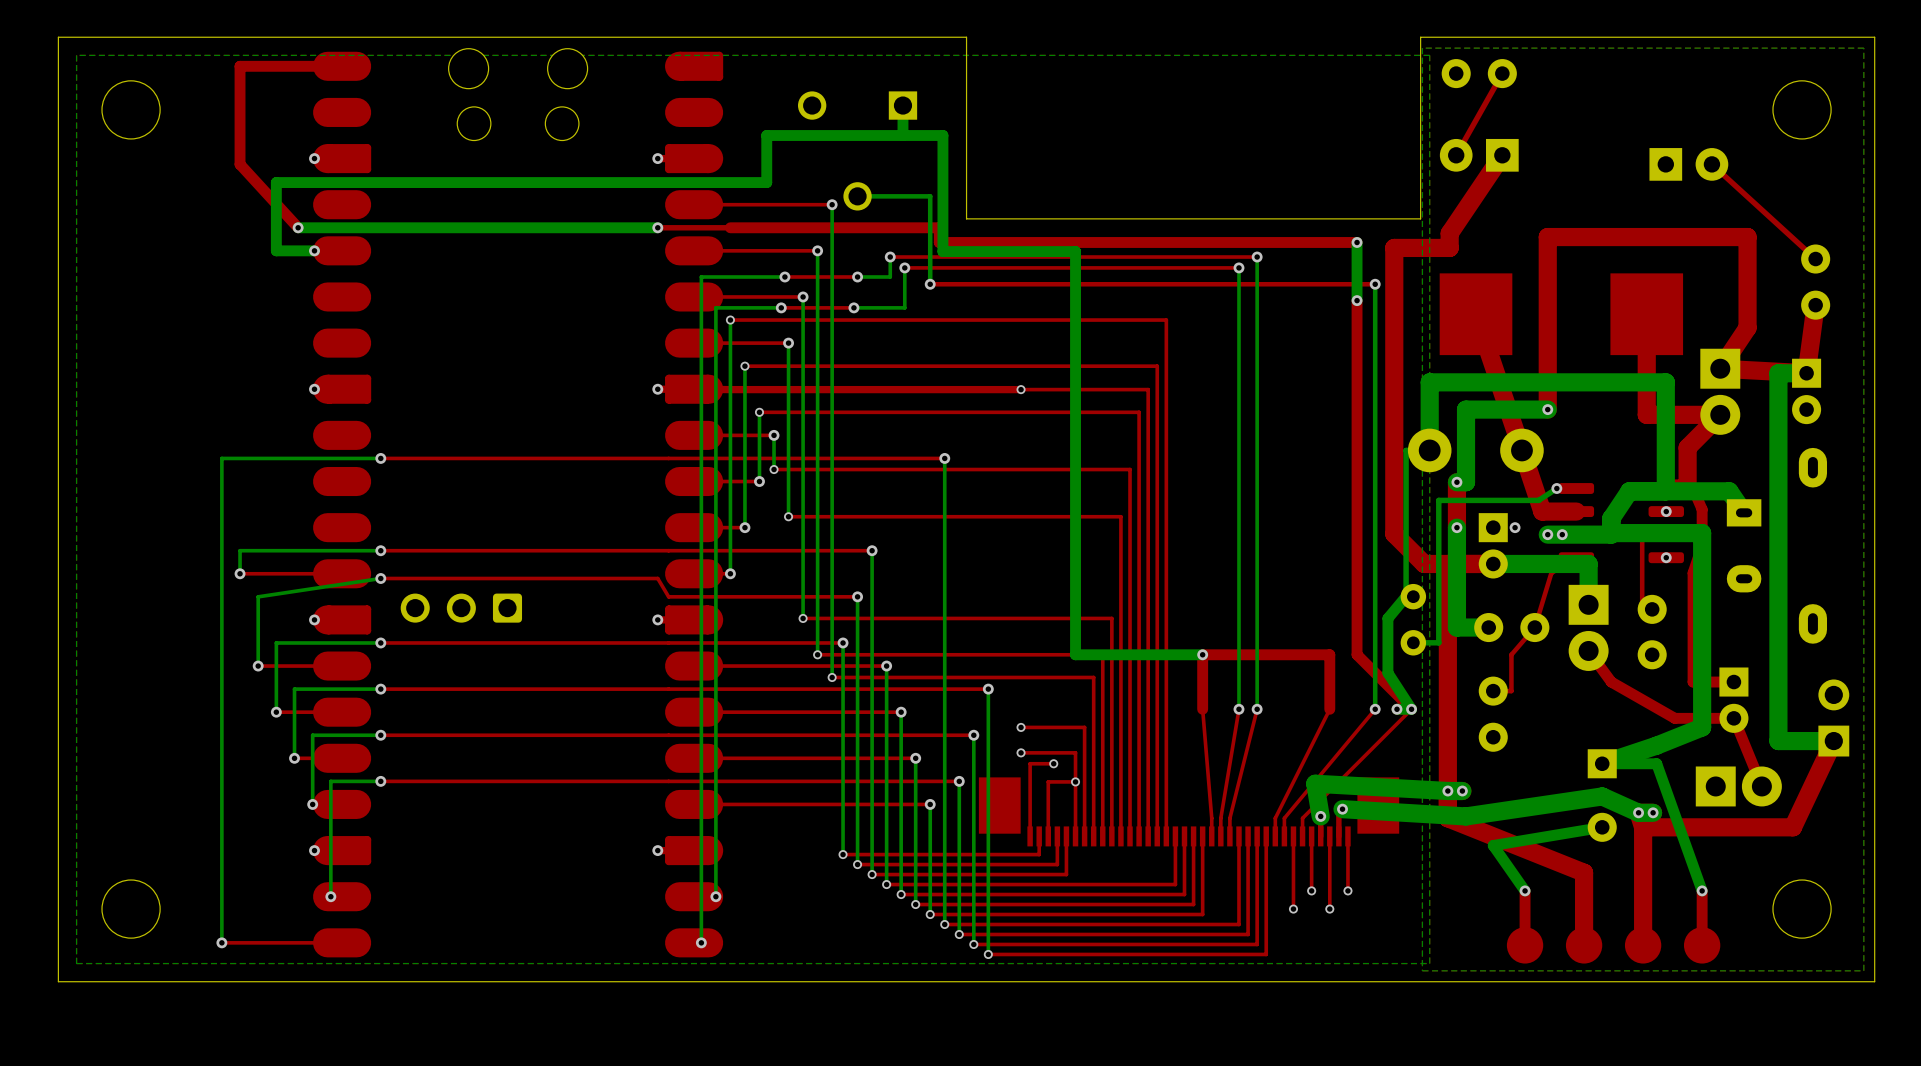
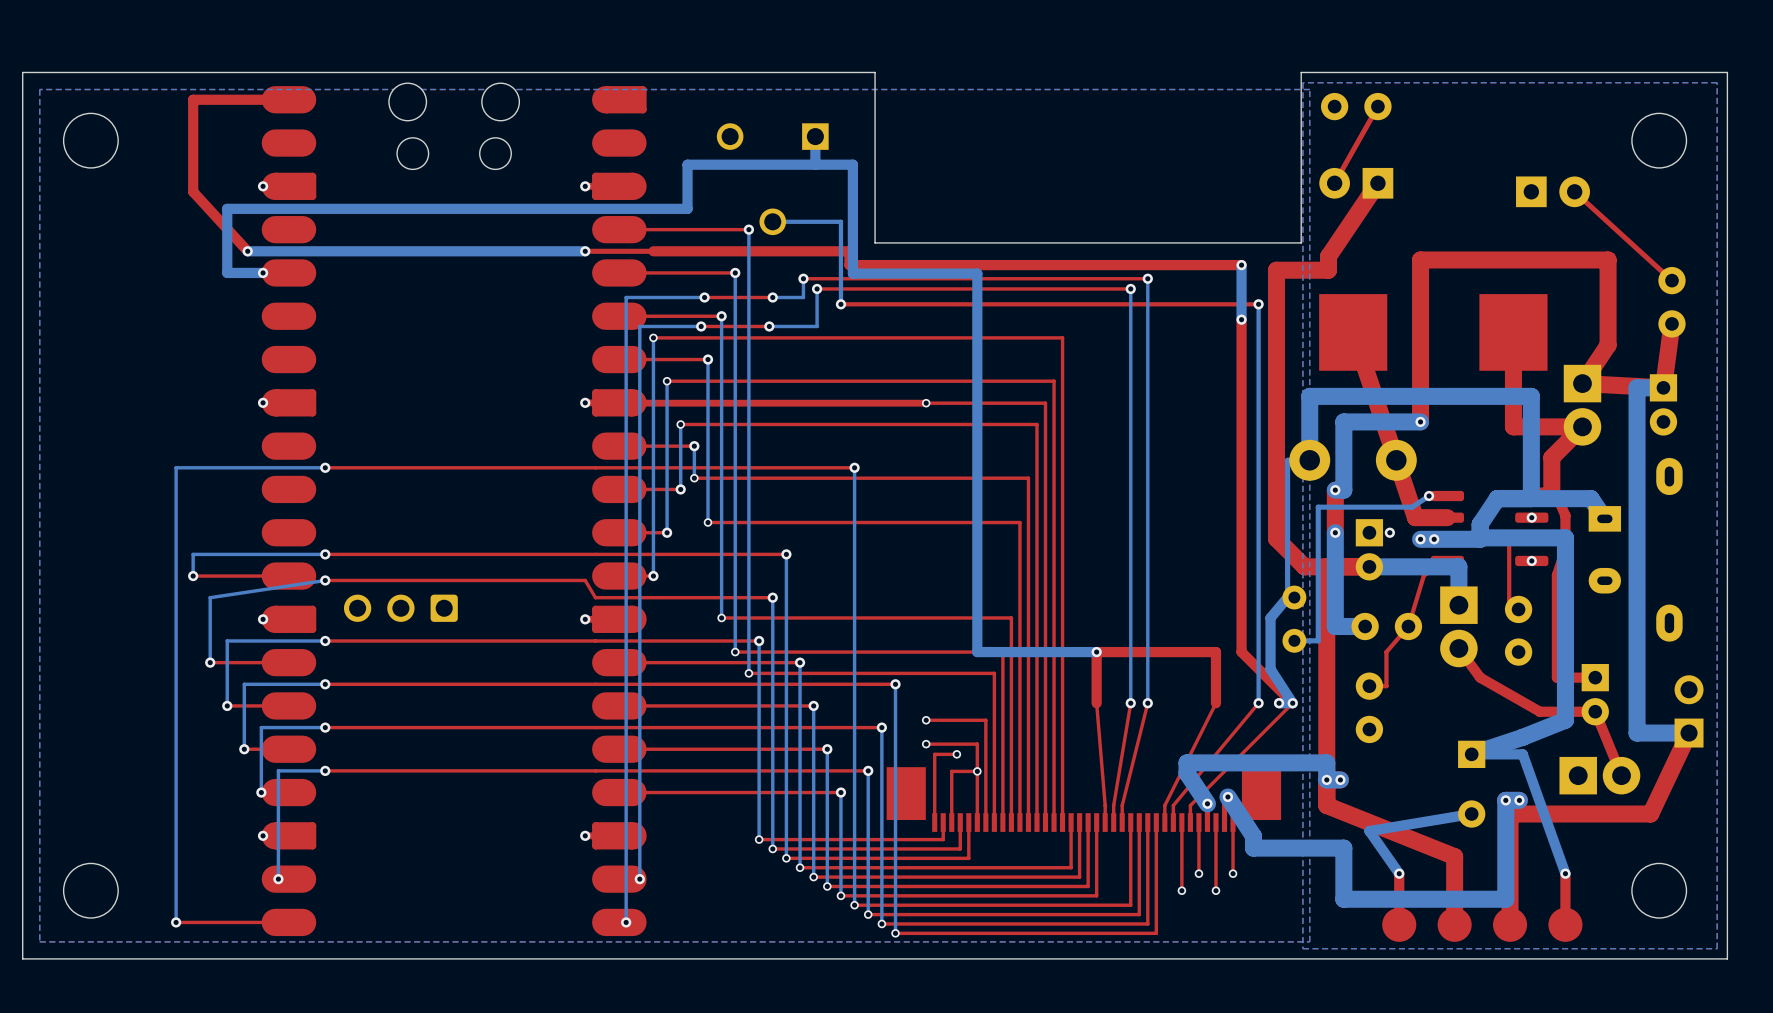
bottom track: (1447, 791) (1315, 783) (1320, 816) -> (1326, 779) (1326, 762) (1187, 762) (1187, 773) (1207, 803)
bottom track: (1342, 809) (1466, 816) (1602, 796) (1638, 812) -> (1227, 796) (1253, 836) (1253, 848) (1343, 848) (1343, 899) (1505, 899) (1505, 800)

